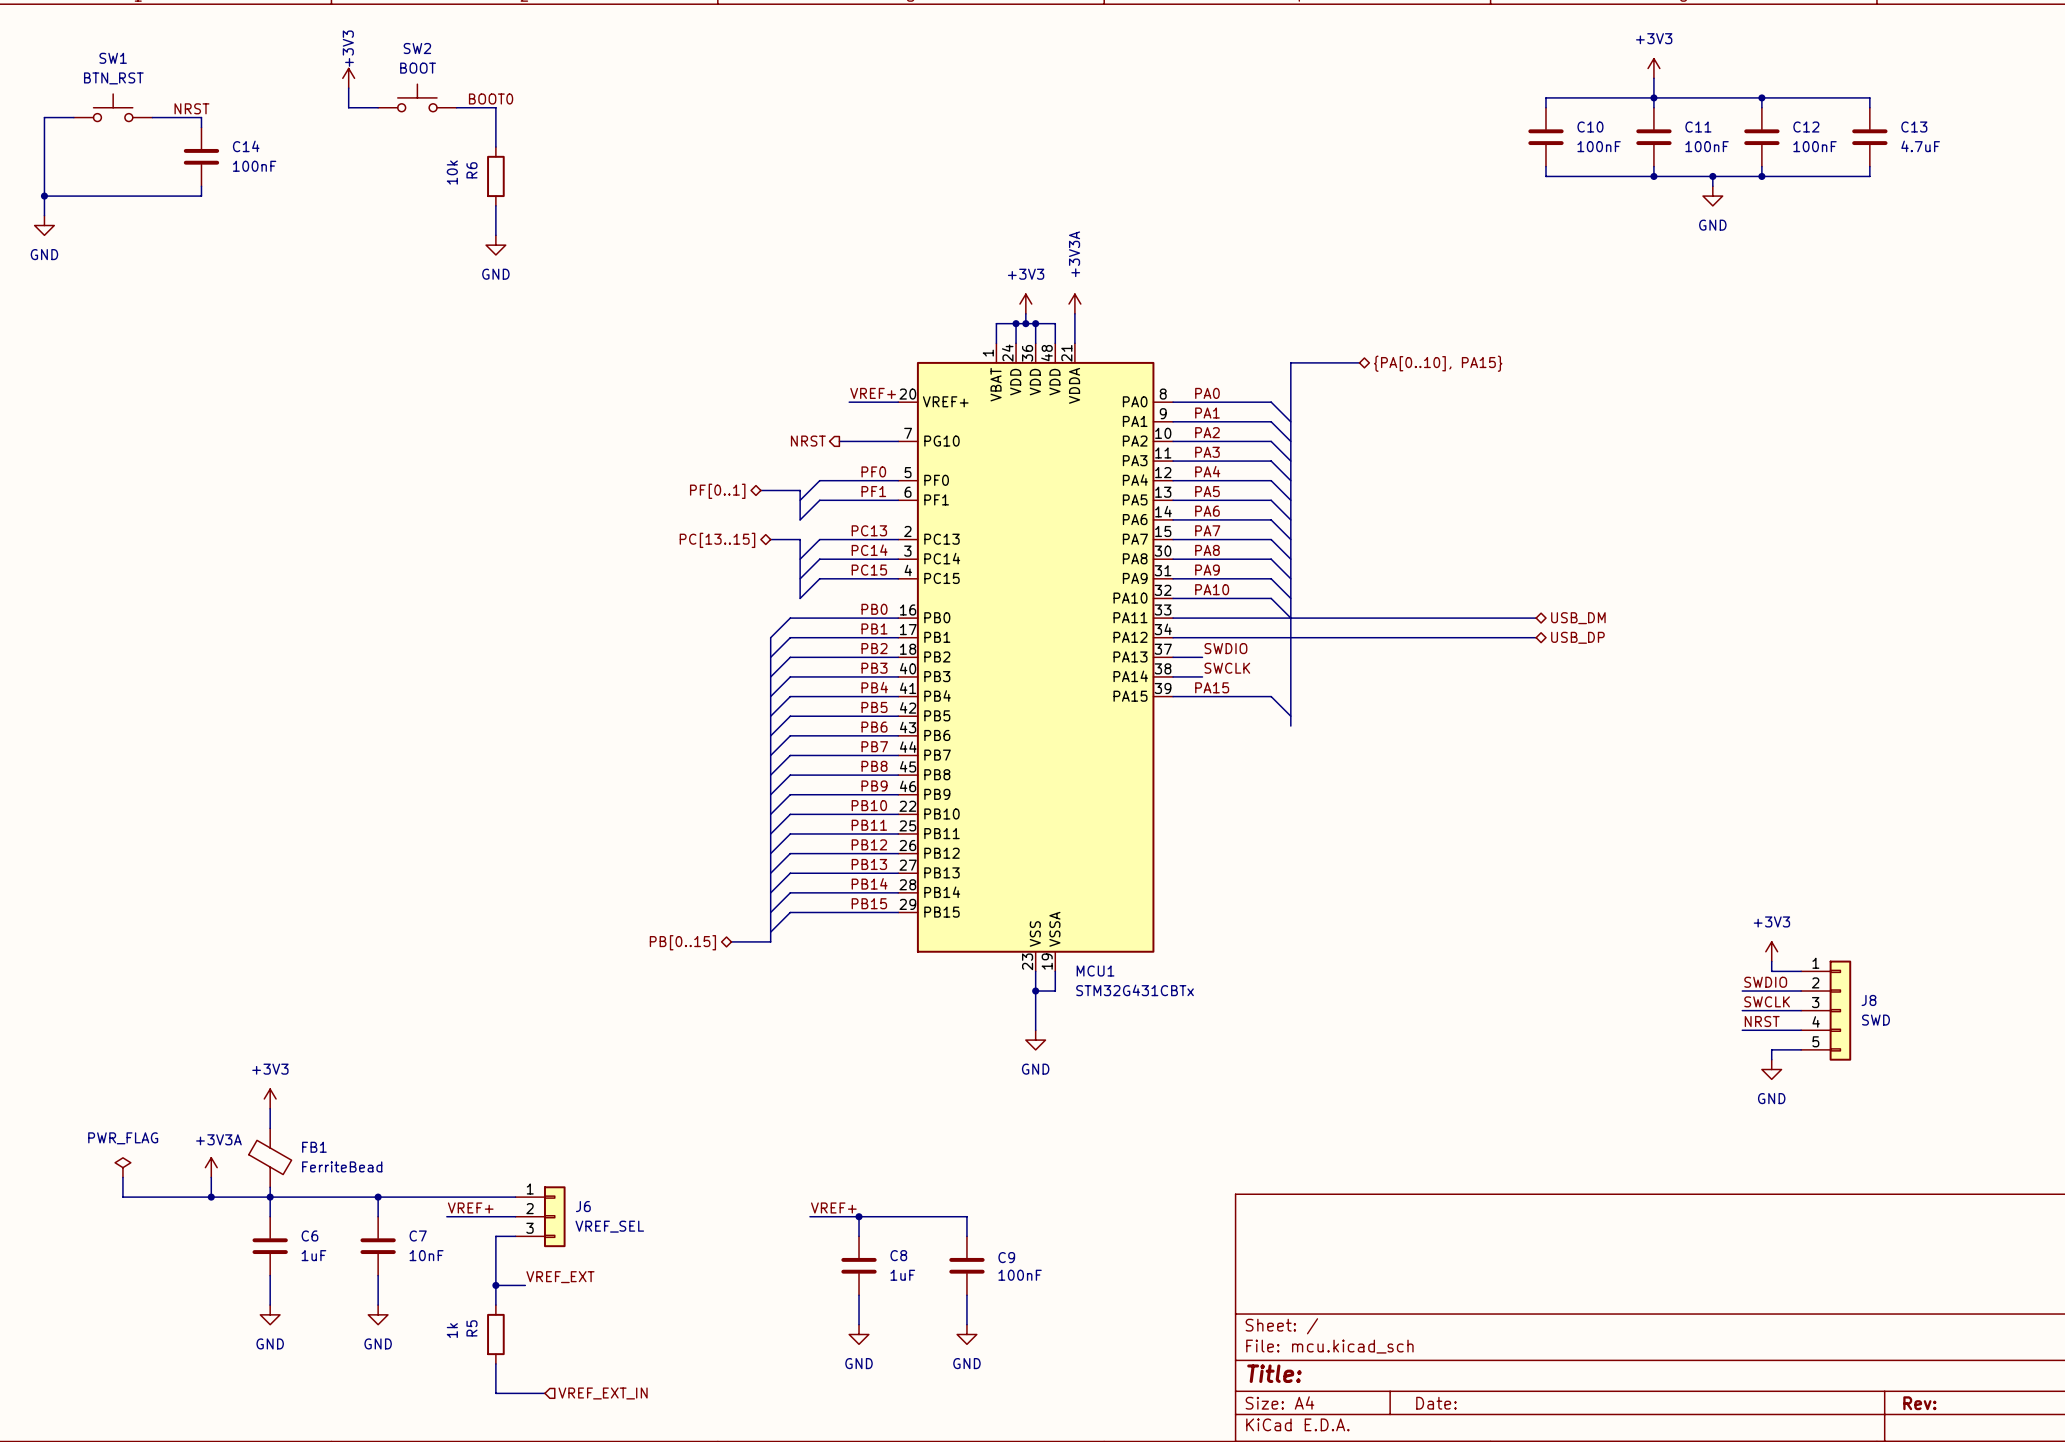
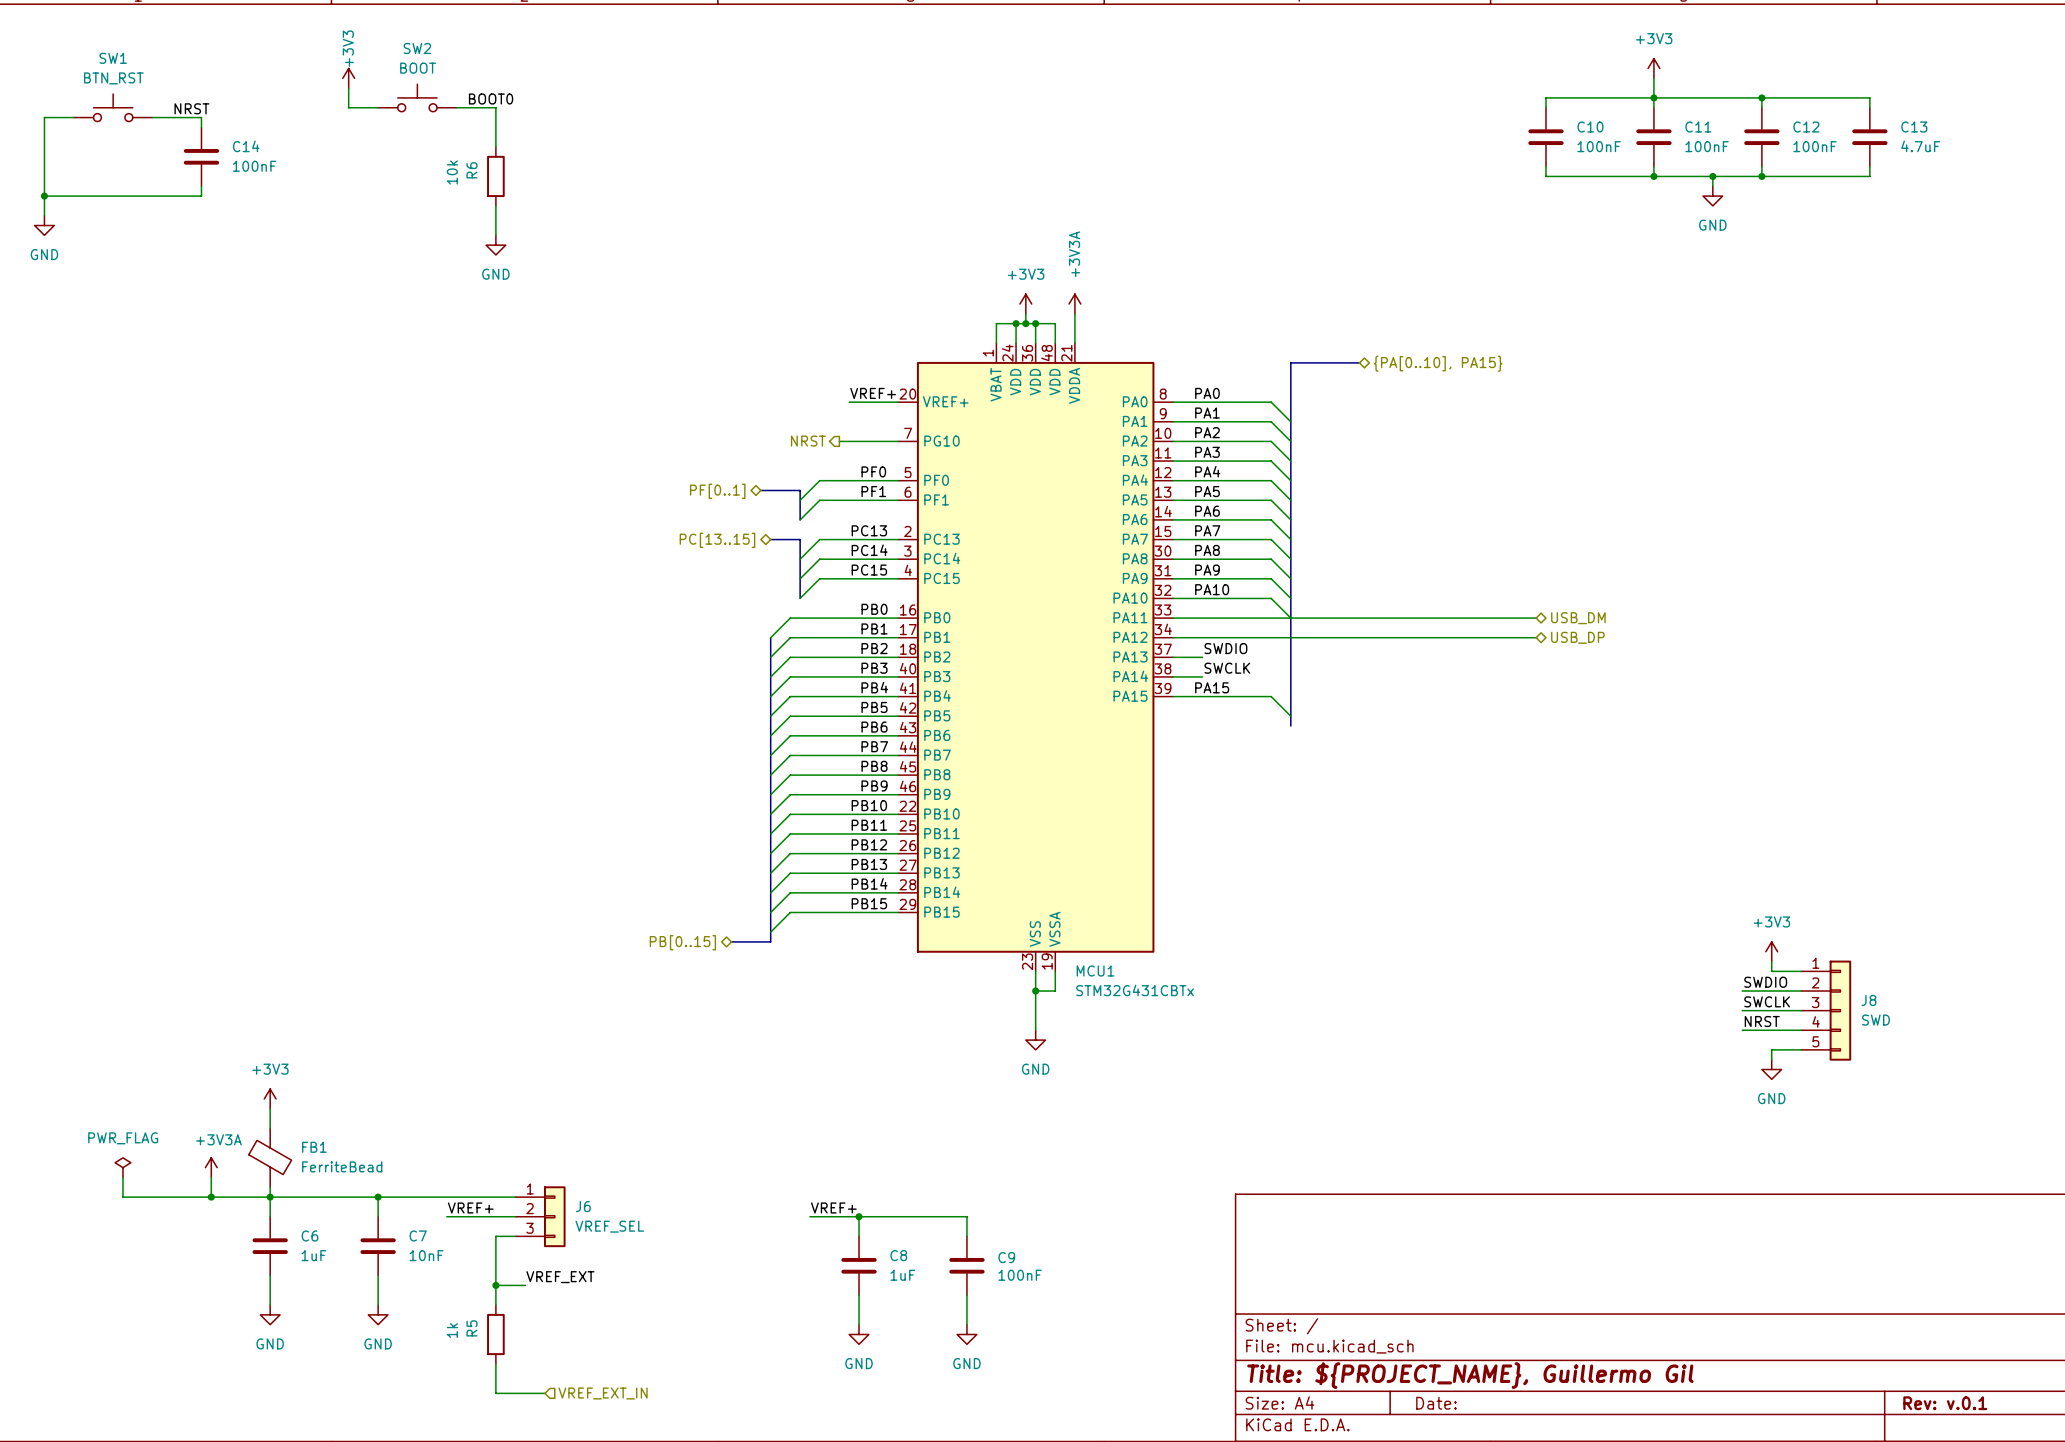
title block: Title: (1274, 1373) -> Title: ${PROJECT_NAME}, Guillermo Gil (1470, 1375)
title block: Rev: (1919, 1403) -> Rev: v.0.1 (1945, 1403)

